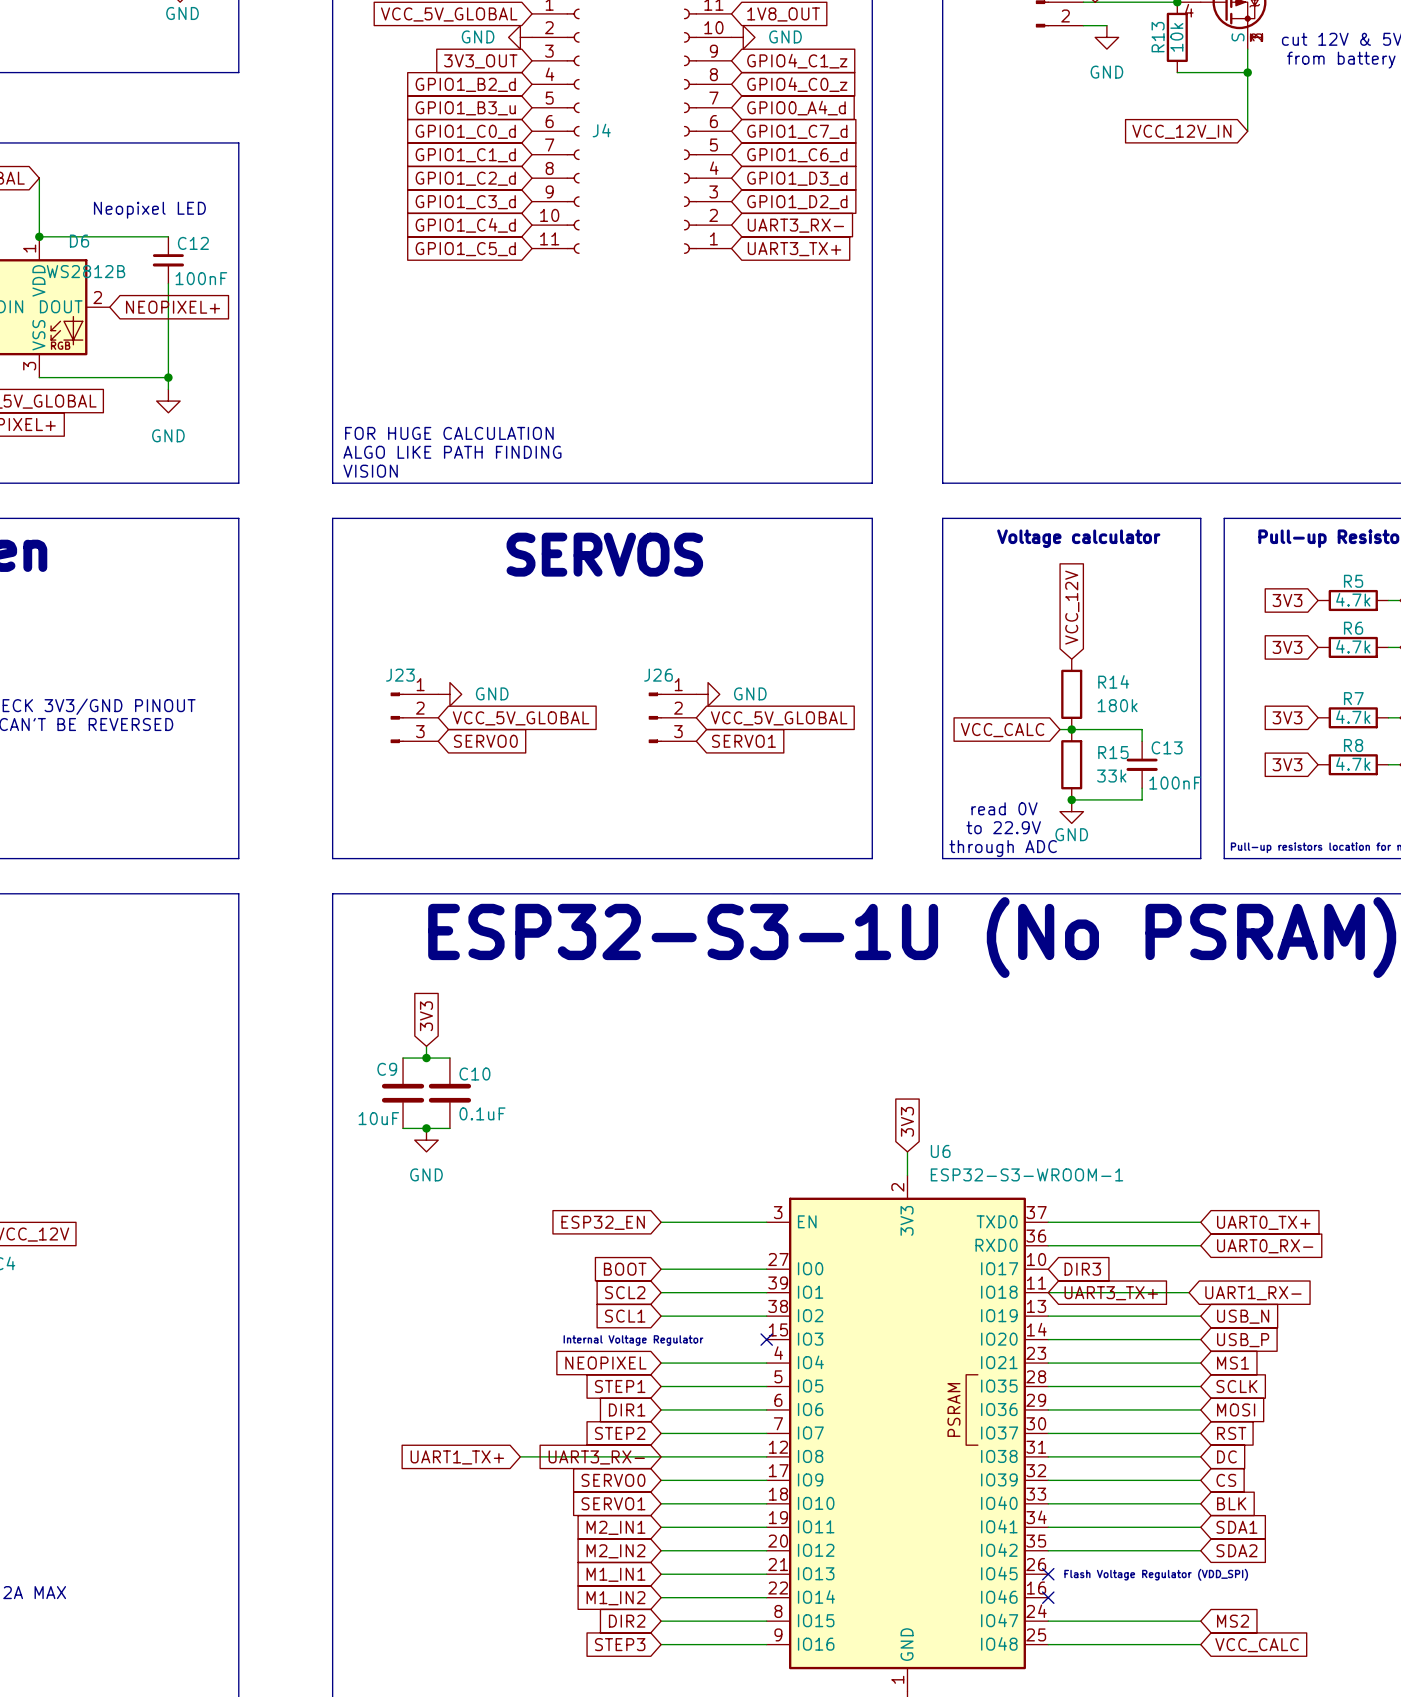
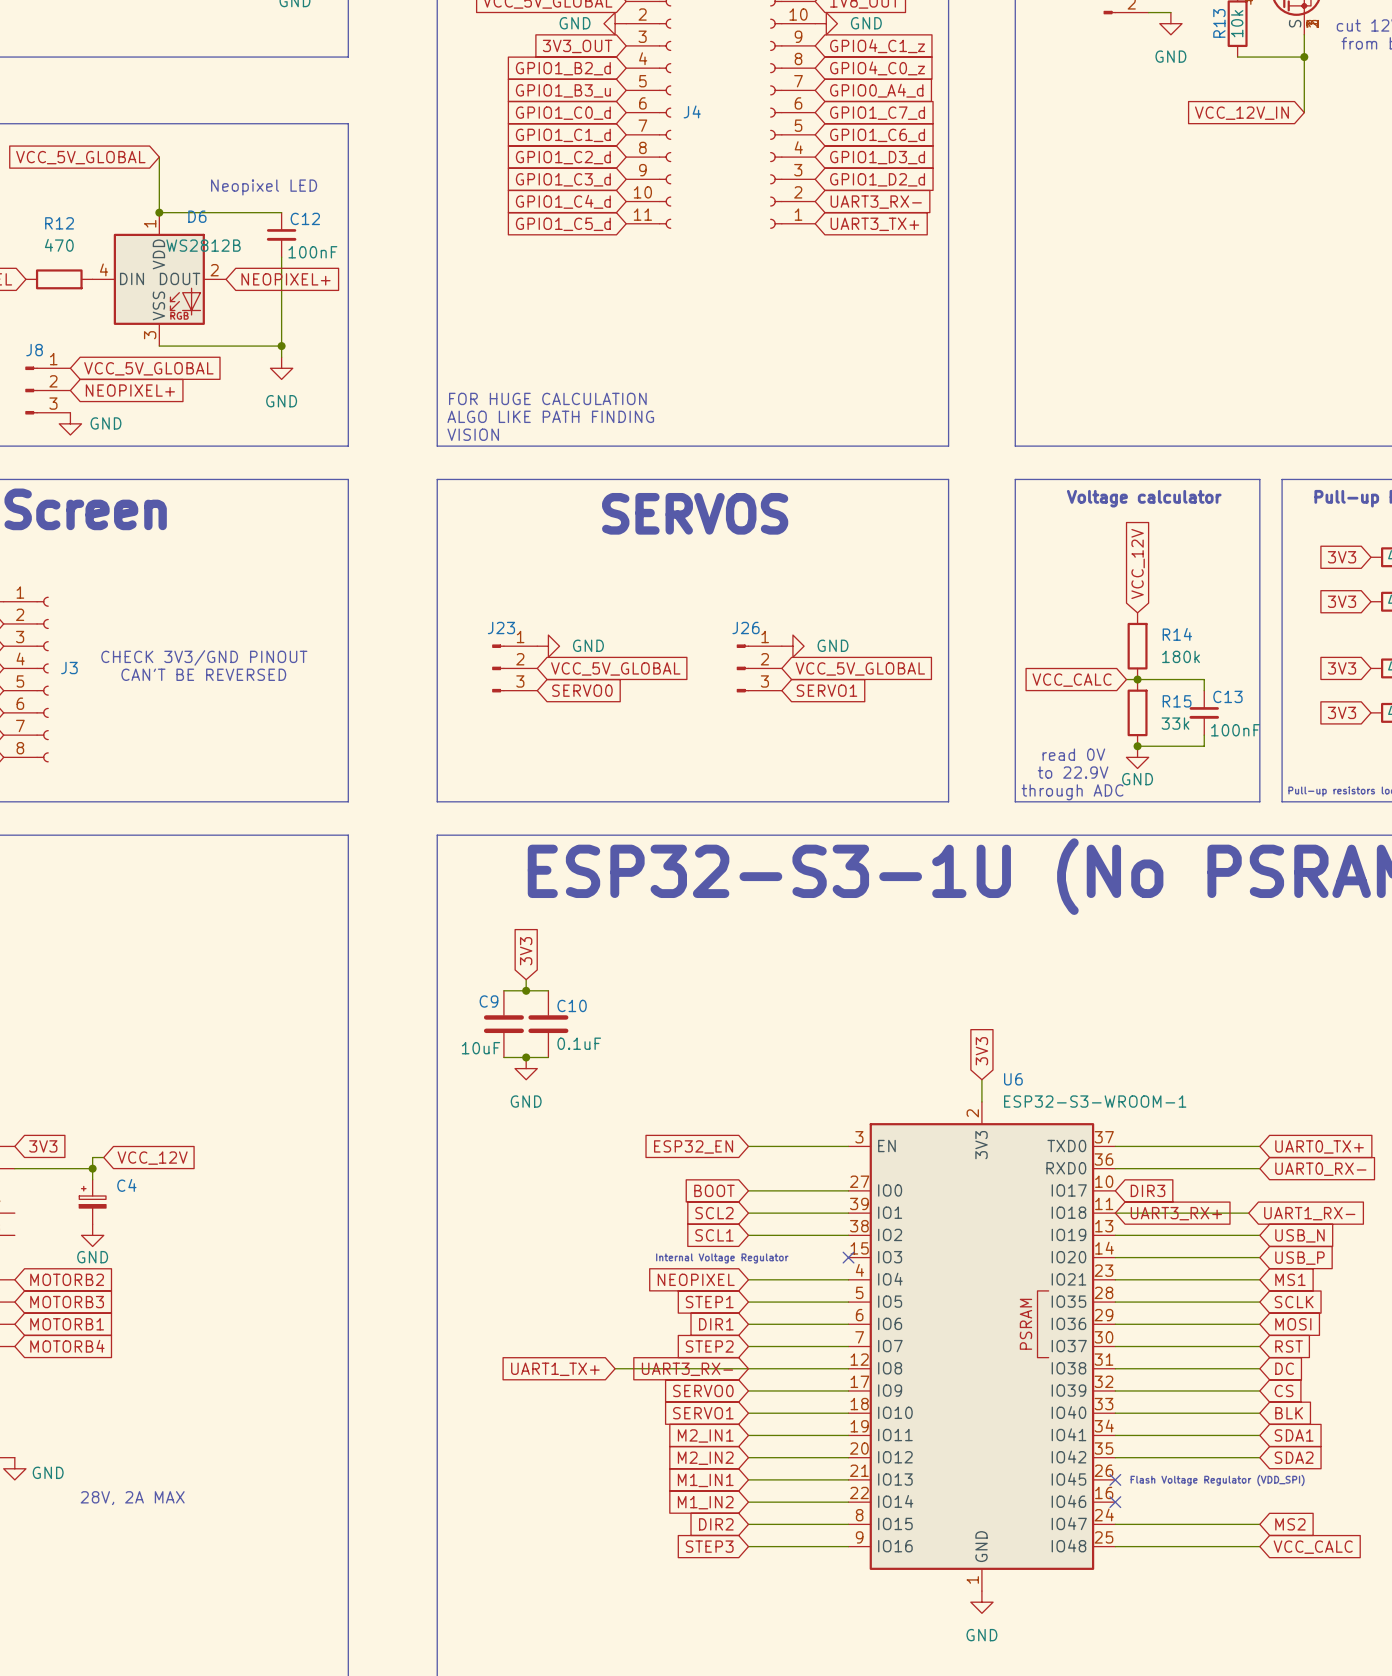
global label: UART3_TX+ (1111, 1293) -> UART3_RX+ (1176, 1213)

